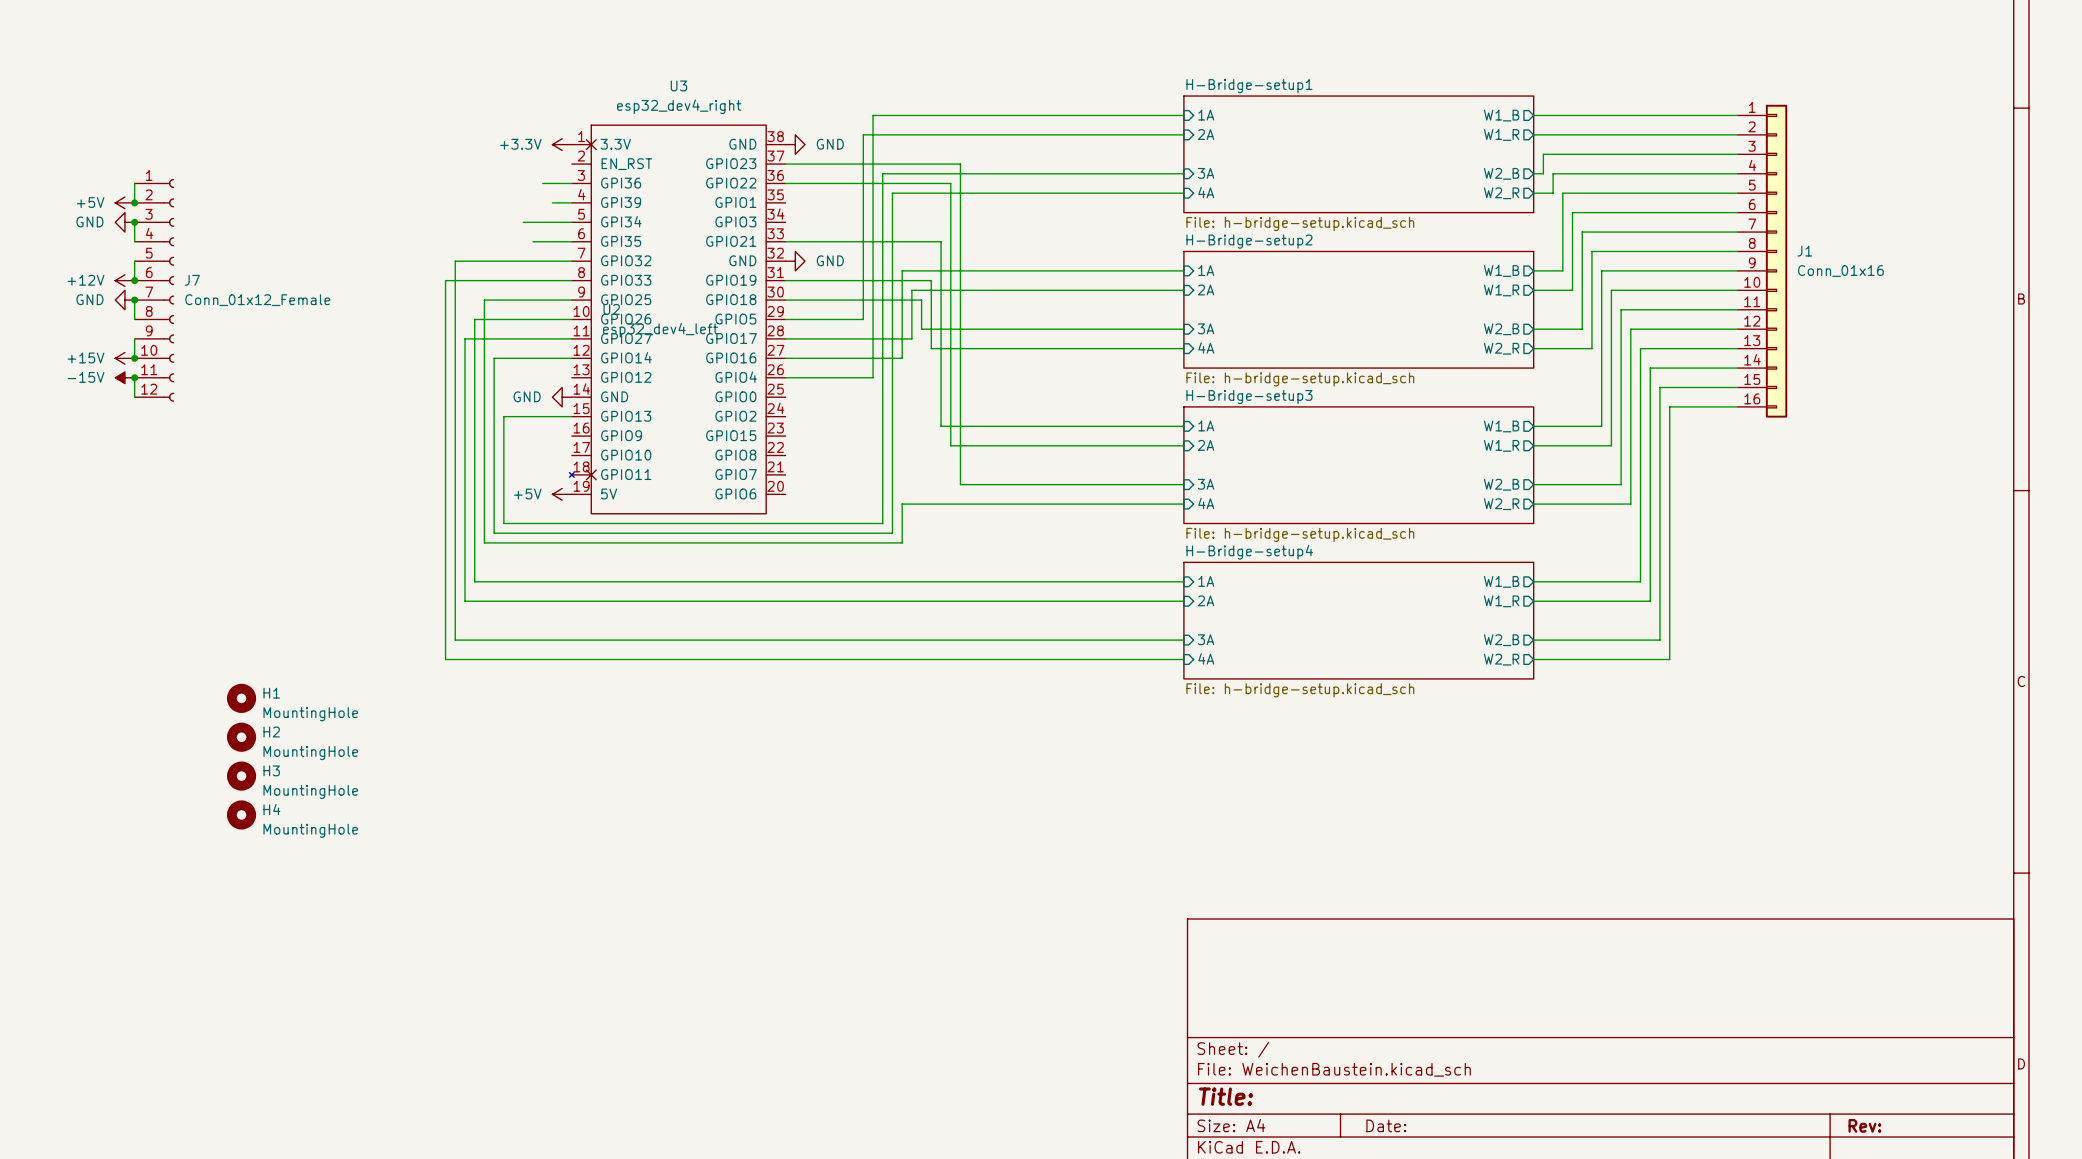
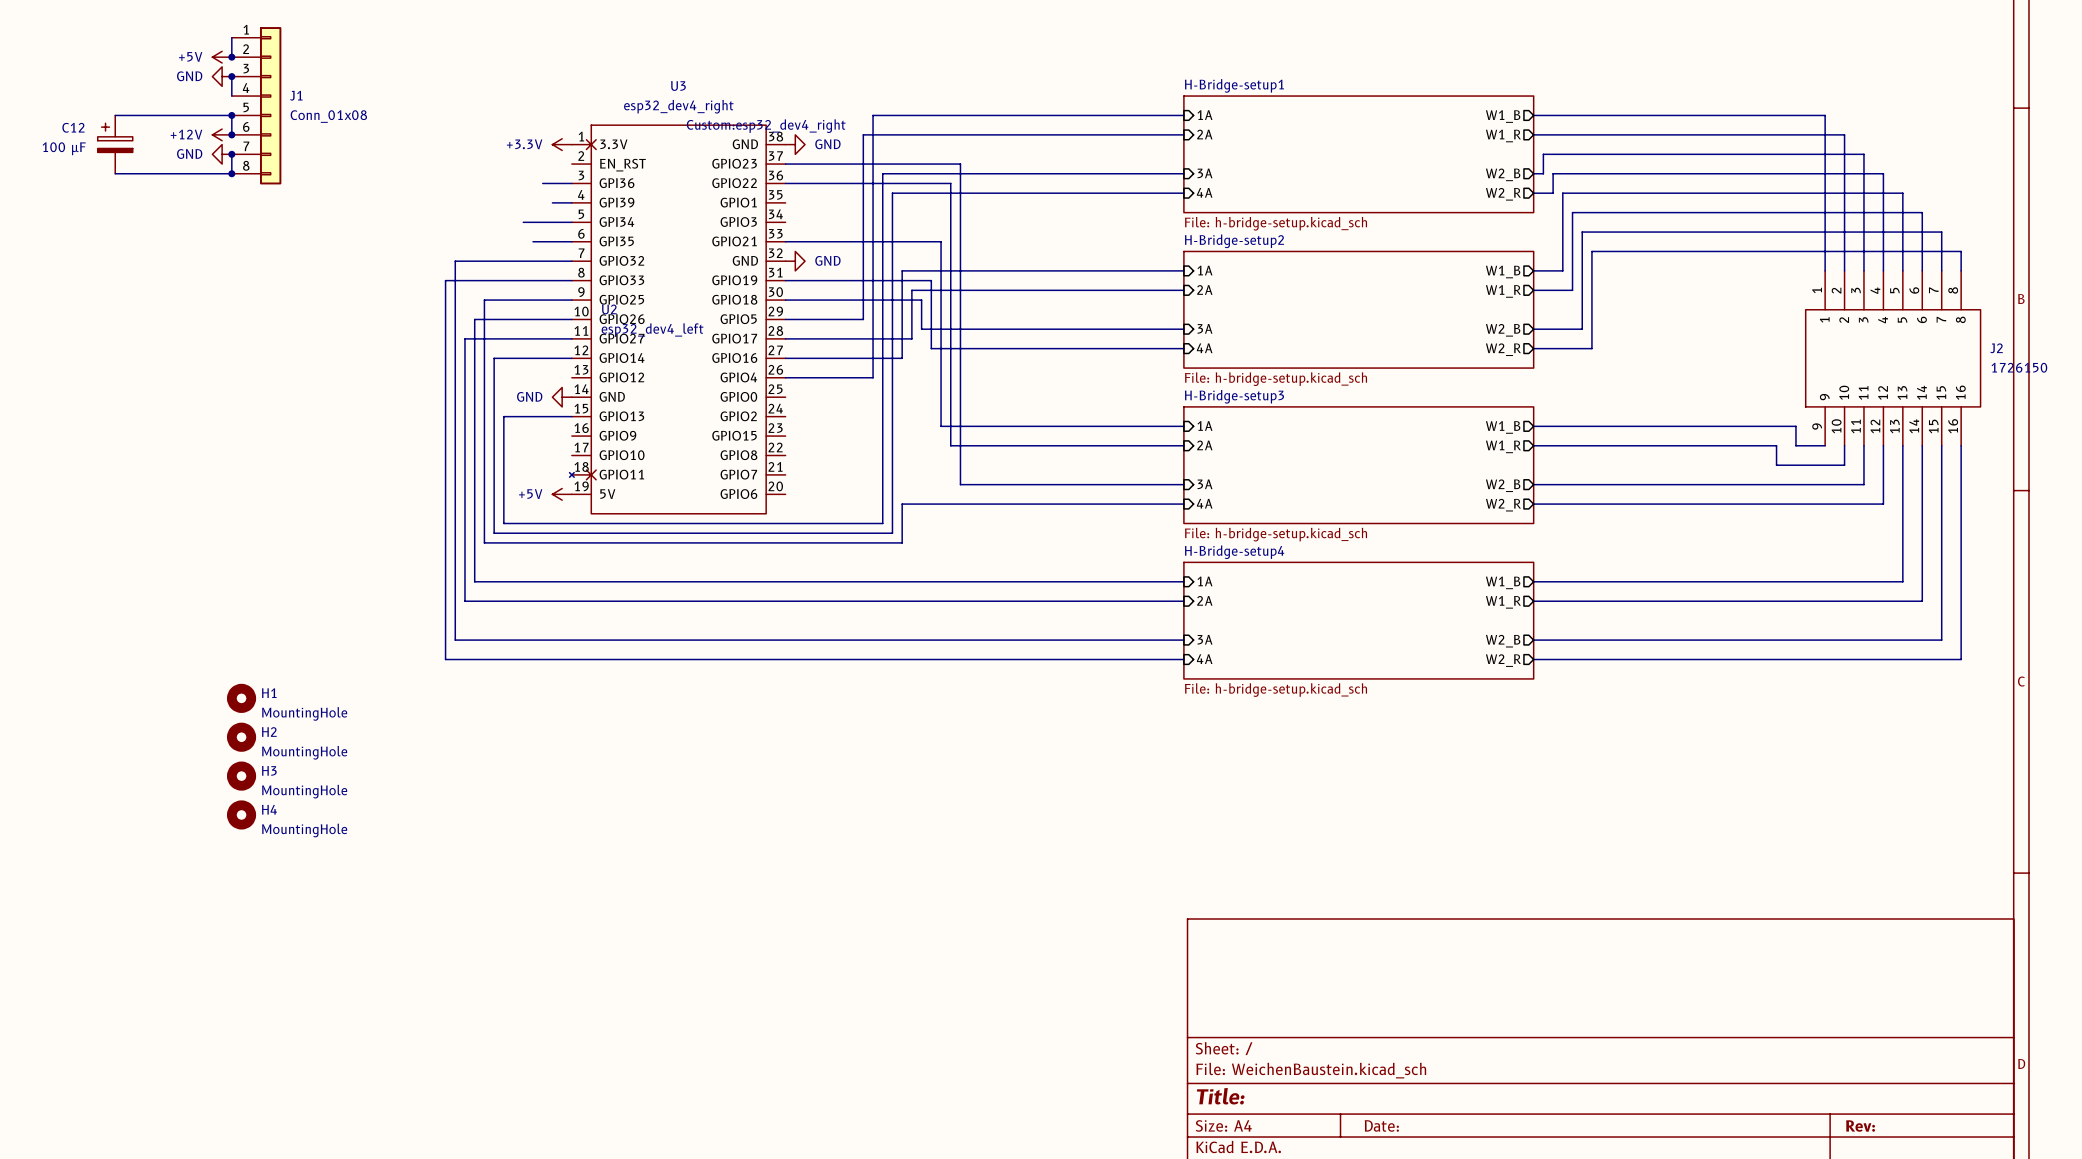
junction: none -> (231, 57)
power symbol: none -> GND (222, 76)
junction: none -> (231, 76)
J1 symbol: [1737, 104, 1788, 418] -> [231, 27, 282, 185]
wire: none -> (115, 115) (231, 115) (231, 134)
junction: none -> (231, 115)
wire: none -> (1737, 115) (1825, 115) (1825, 270)
U3 text: none -> Custom:esp32_dev4_right (766, 126)
junction: none -> (231, 134)
wire: none -> (1737, 134) (1844, 134) (1844, 270)
C12: none -> 100 µF (115, 144)
power symbol: none -> GND (222, 154)
wire: none -> (231, 154) (231, 173) (115, 173)
junction: none -> (231, 154)
wire: none -> (1737, 154) (1863, 154) (1863, 270)
junction: none -> (231, 173)
wire: none -> (1737, 173) (1883, 173) (1883, 270)
wire: (134, 183) (134, 202) -> (231, 37) (231, 57)
wire: none -> (1737, 193) (1902, 193) (1902, 270)
power symbol position: +5V (124, 202) -> +5V (222, 57)
junction: (134, 202) -> none
wire: none -> (1737, 212) (1922, 212) (1922, 270)
power symbol: GND (124, 222) -> none
wire: (134, 222) (134, 241) -> (231, 76) (231, 96)
junction: (134, 222) -> none
wire: none -> (1737, 232) (1941, 232) (1941, 270)
wire: none -> (1737, 251) (1961, 251) (1961, 270)
wire: (134, 261) (134, 280) -> none
wire: (1737, 270) (1601, 270) (1601, 426) -> (1825, 445) (1795, 445) (1795, 426) (1601, 426)
J1 value: Conn_01x16 (1840, 271) -> Conn_01x08 (328, 116)
power symbol position: +12V (124, 280) -> +12V (222, 134)
junction: (134, 280) -> none
J7: Conn_01x12_Female (154, 290) -> none
wire: (1737, 290) (1611, 290) (1611, 445) -> (1844, 445) (1844, 465) (1776, 465) (1776, 445) (1611, 445)
power symbol: GND (124, 300) -> none
wire: (134, 300) (134, 319) -> none
junction: (134, 300) -> none
wire: (1737, 309) (1621, 309) (1621, 484) -> (1863, 445) (1863, 484) (1621, 484)
wire: (1737, 329) (1630, 329) (1630, 504) -> (1883, 445) (1883, 504) (1630, 504)
wire: (134, 338) (134, 358) -> none
wire: (1737, 348) (1640, 348) (1640, 581) -> (1902, 445) (1902, 581) (1640, 581)
power symbol: +15V (124, 358) -> none
junction: (134, 358) -> none
J2: none -> 1726150 (1893, 358)
wire: (1737, 368) (1650, 368) (1650, 601) -> (1922, 445) (1922, 601) (1650, 601)
power symbol: -15V (124, 377) -> none
wire: (134, 377) (134, 397) -> none
junction: (134, 377) -> none
wire: (1737, 387) (1659, 387) (1659, 640) -> (1941, 445) (1941, 640) (1659, 640)
wire: (1737, 406) (1669, 406) (1669, 659) -> (1961, 445) (1961, 659) (1669, 659)

